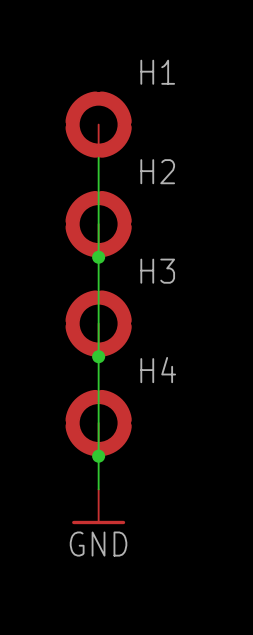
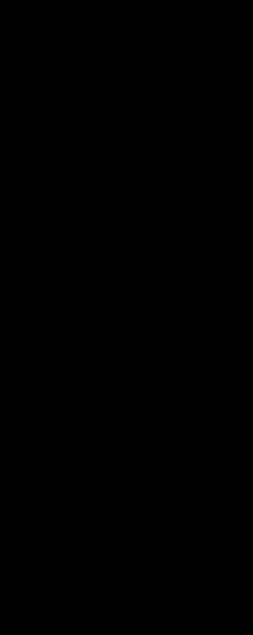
H1: (98, 124) -> none
wire: (98, 157) (98, 489) -> none
H2: (98, 224) -> none
junction: (98, 257) -> none
H3: (98, 323) -> none
junction: (98, 356) -> none
H4: (98, 423) -> none
junction: (98, 456) -> none
power symbol: GND (98, 506) -> none

